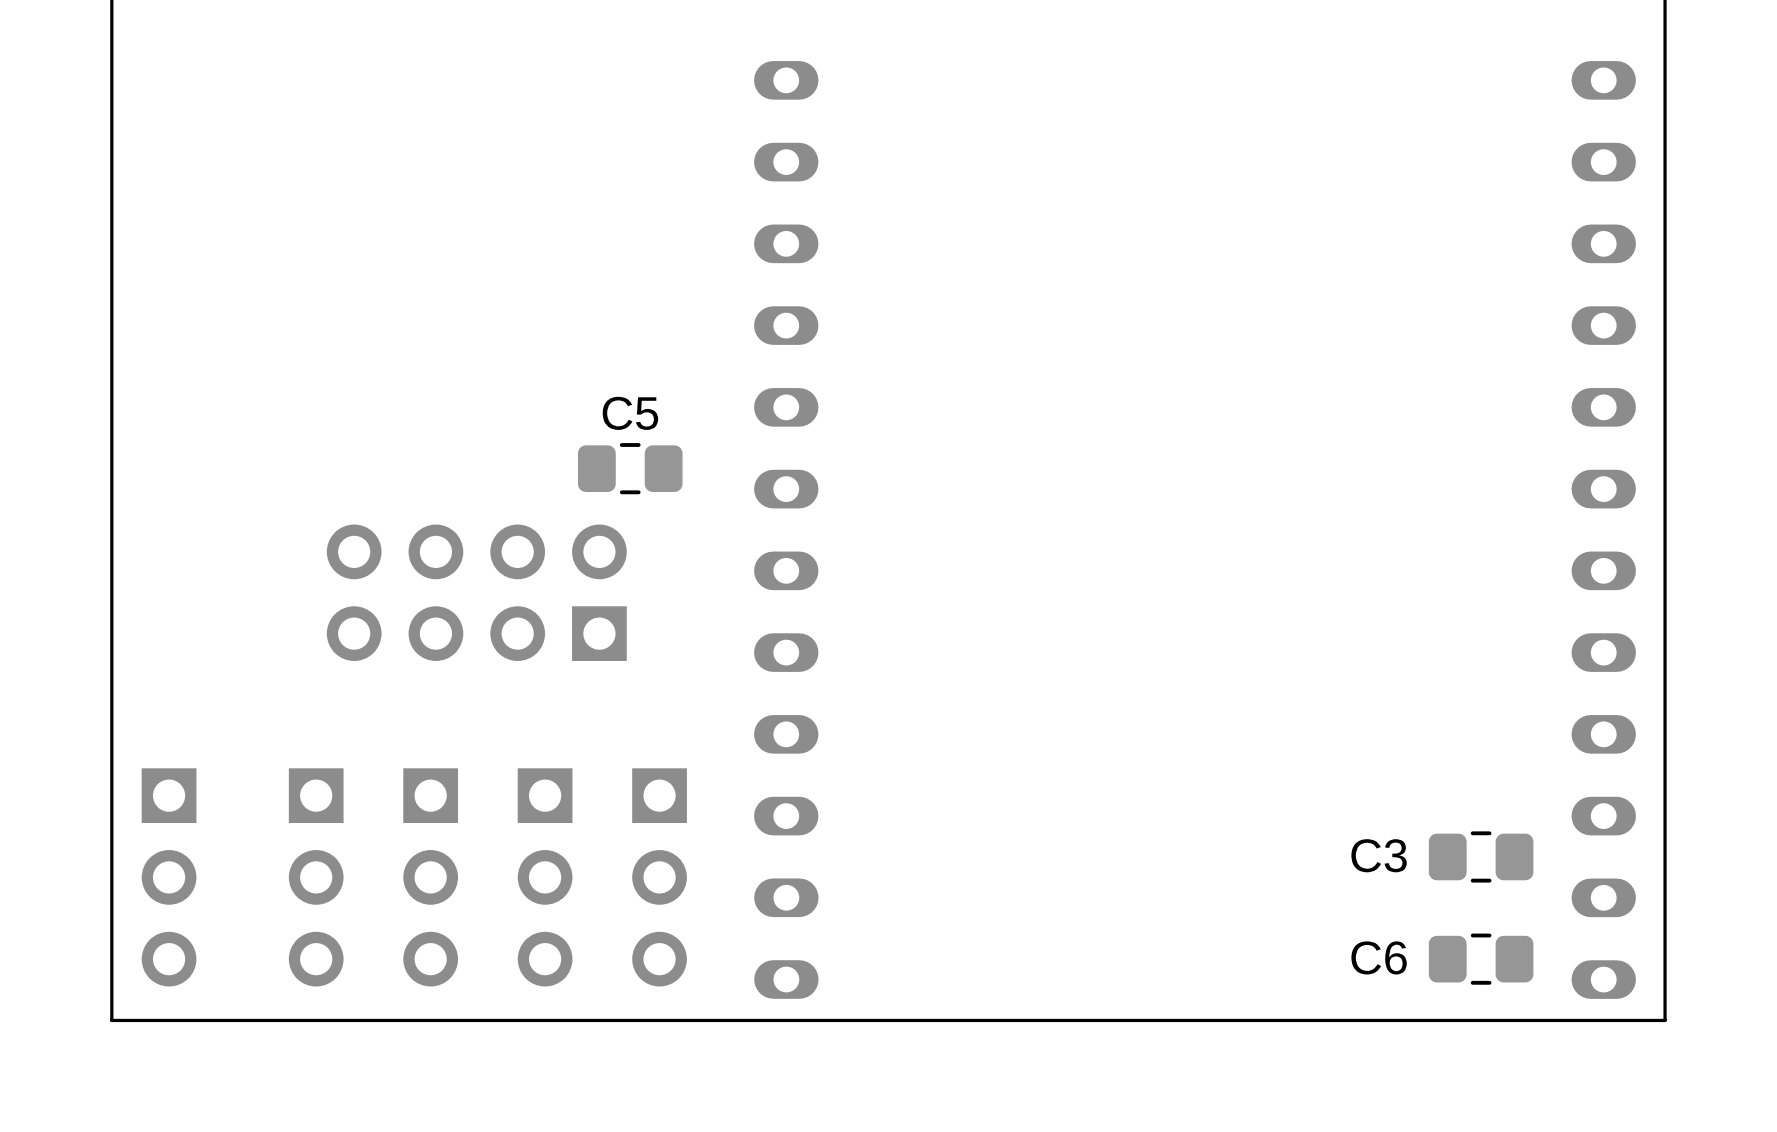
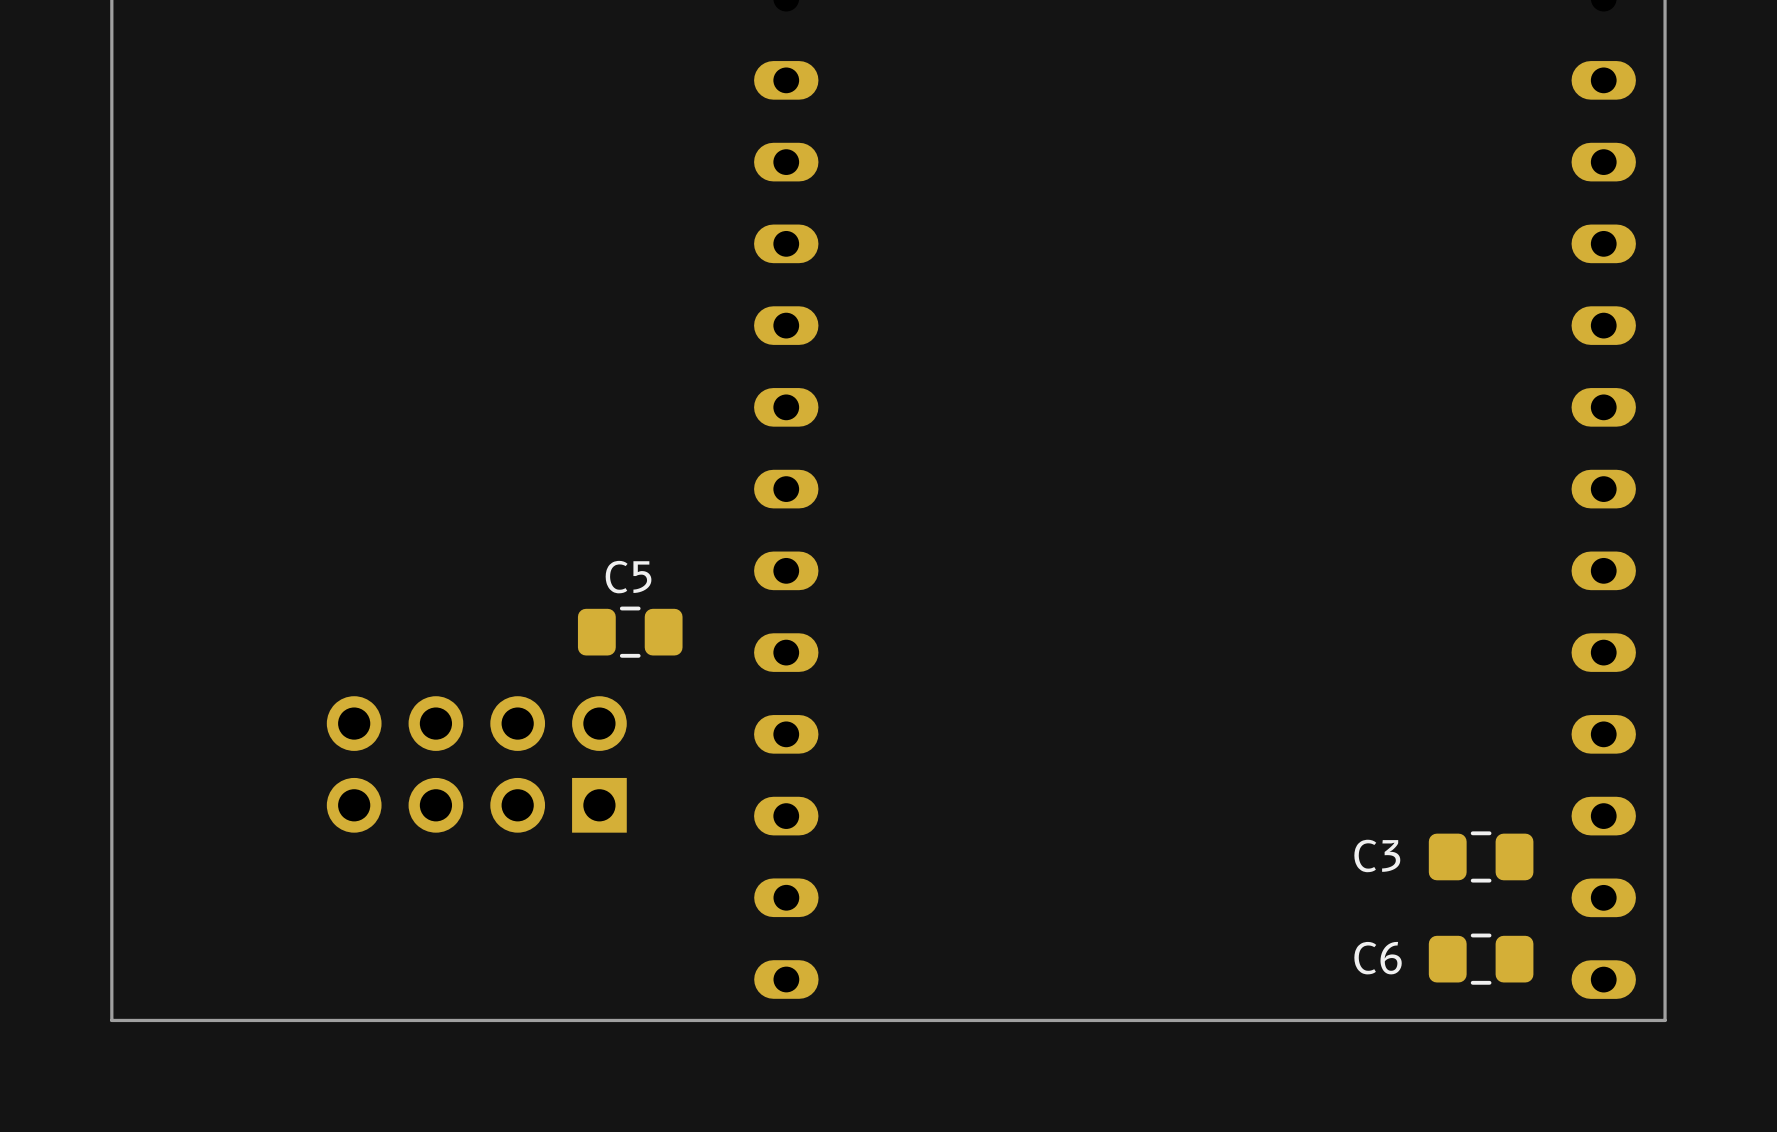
C5 position: (630, 468) -> (630, 632)
part position: (476, 592) -> (476, 764)
part: (169, 877) -> none
part: (316, 877) -> none
part: (430, 877) -> none
part: (545, 877) -> none
part: (659, 877) -> none

